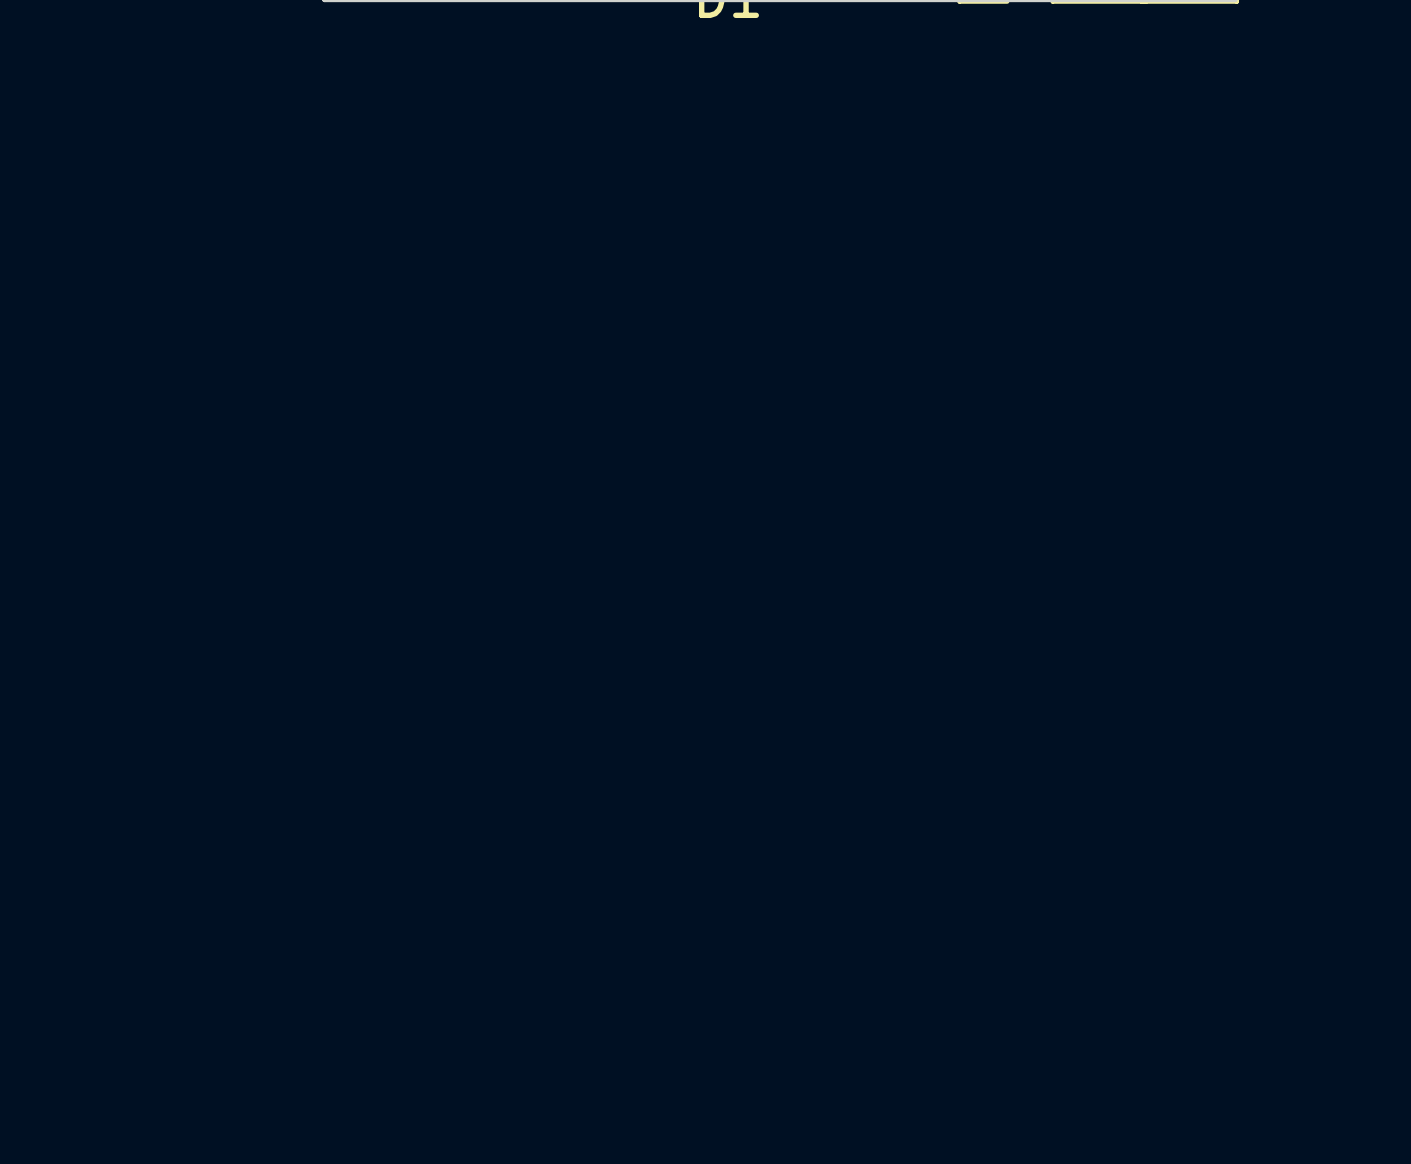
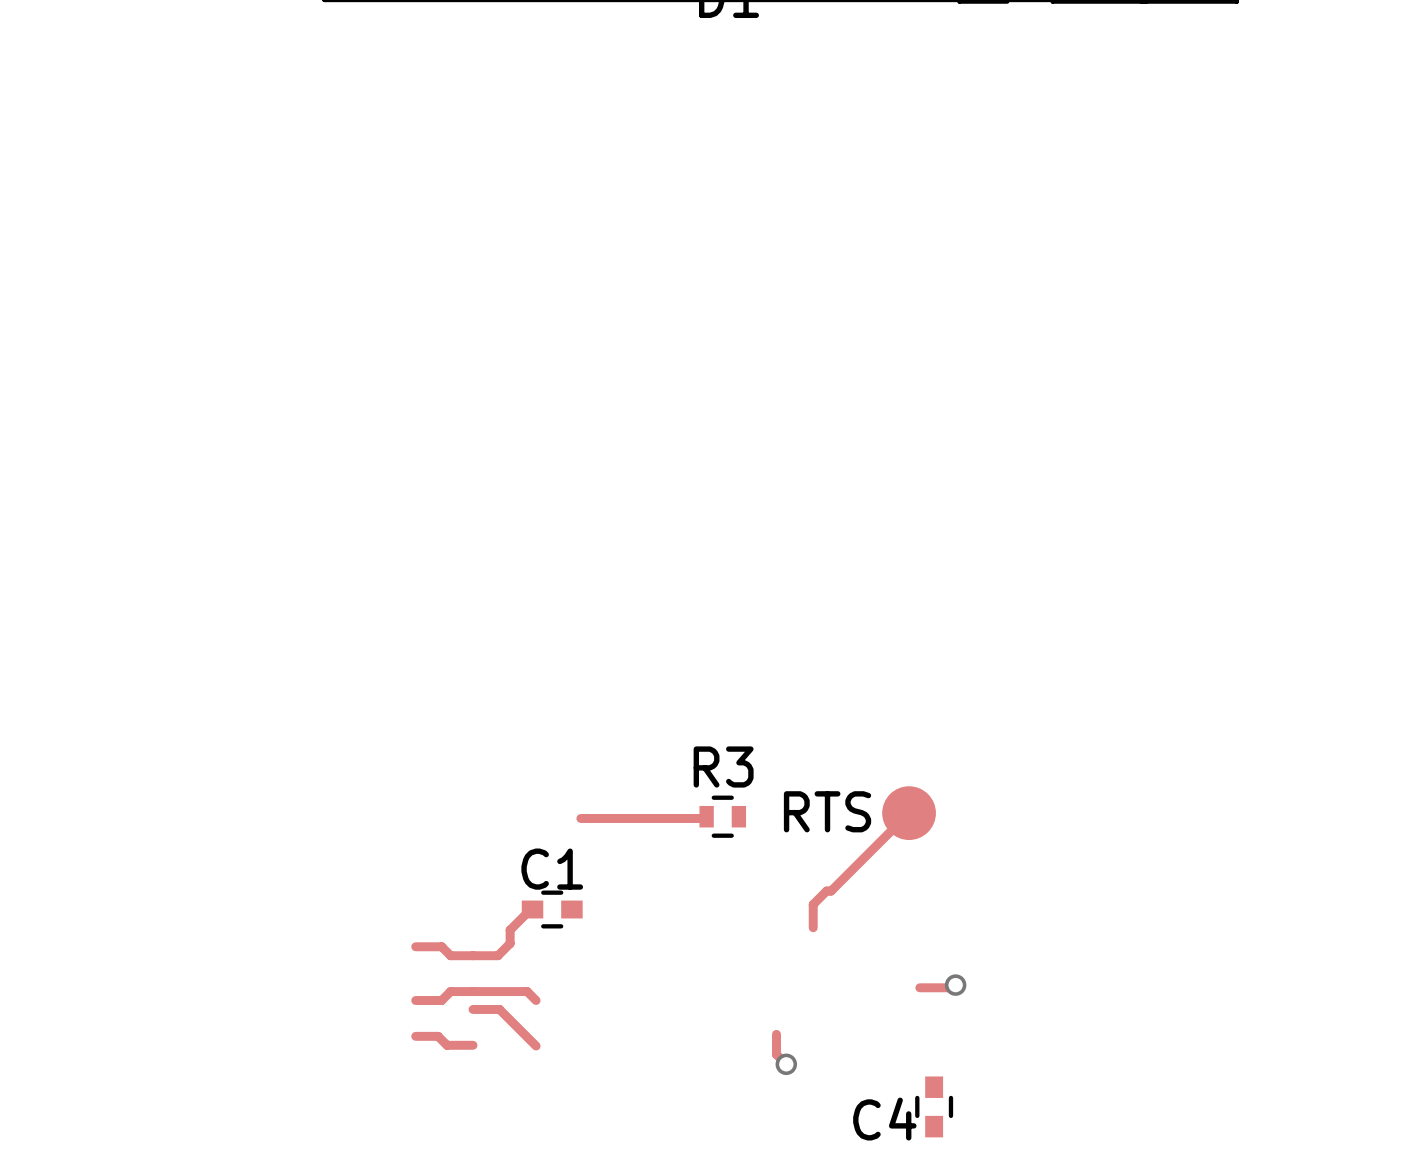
track: none -> (909, 813) (831, 891) (826, 891) (813, 904) (813, 927)
RTS: none -> (909, 813)
track: none -> (706, 816) (704, 818) (580, 818)
R3: none -> (722, 816)
track: none -> (532, 909) (510, 930) (510, 943) (497, 955) (450, 955) (441, 946) (415, 946)
C1: none -> (552, 909)
track: none -> (955, 985) (952, 987) (919, 987)
via: none -> (955, 985)
track: none -> (415, 1000) (441, 1000) (450, 991) (527, 991) (536, 1000)
track: none -> (473, 1009) (499, 1009) (536, 1046)
track: none -> (776, 1034) (776, 1054) (786, 1064)
track: none -> (415, 1036) (438, 1036) (447, 1045) (473, 1045)
via: none -> (786, 1064)
C4: none -> (934, 1106)

